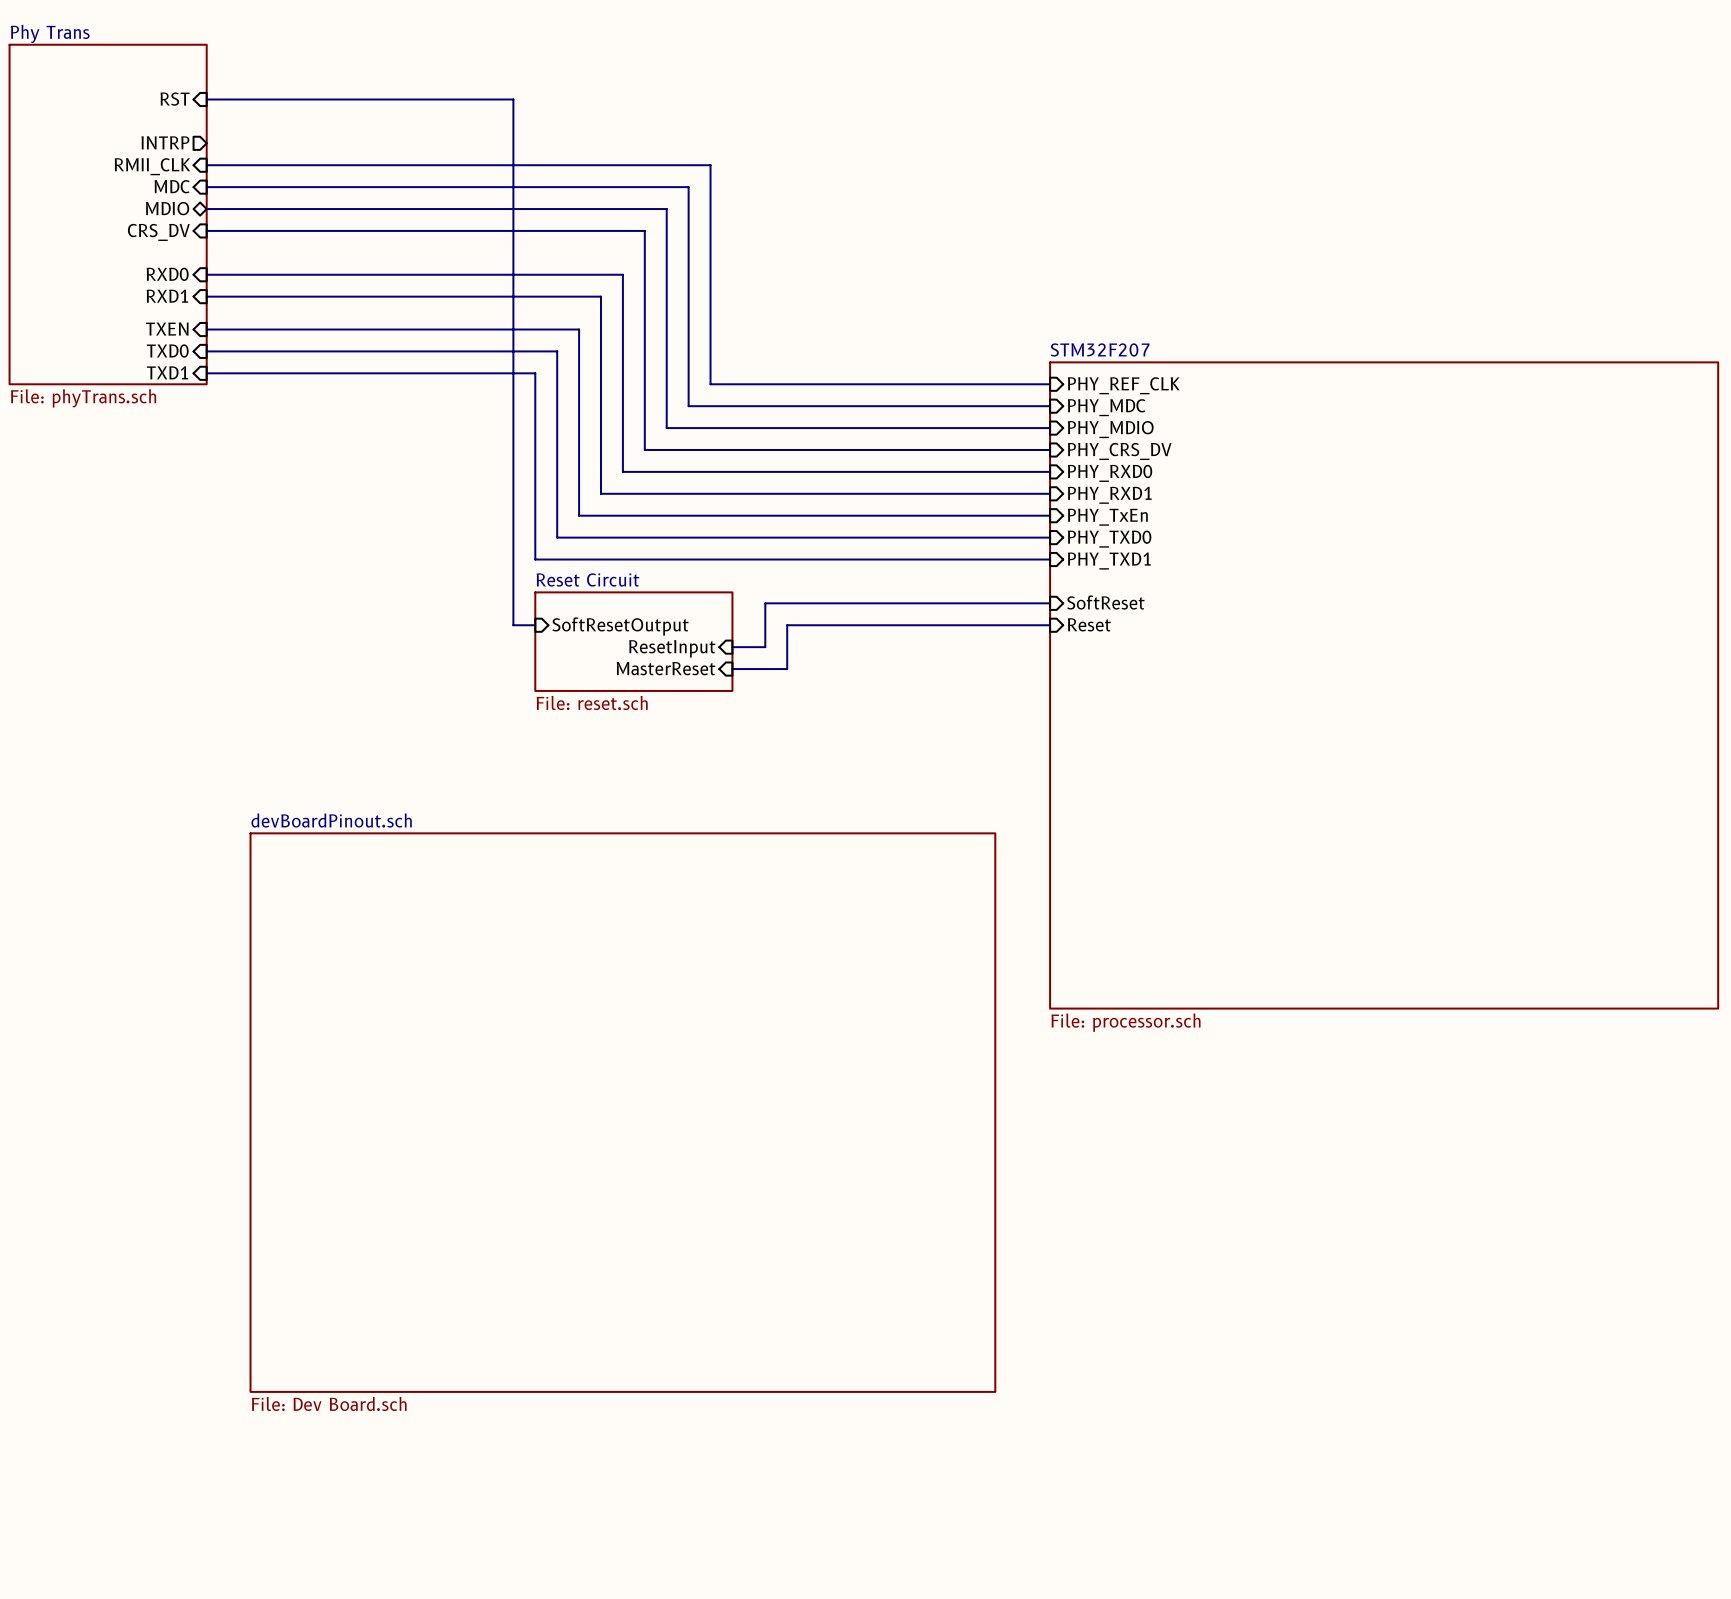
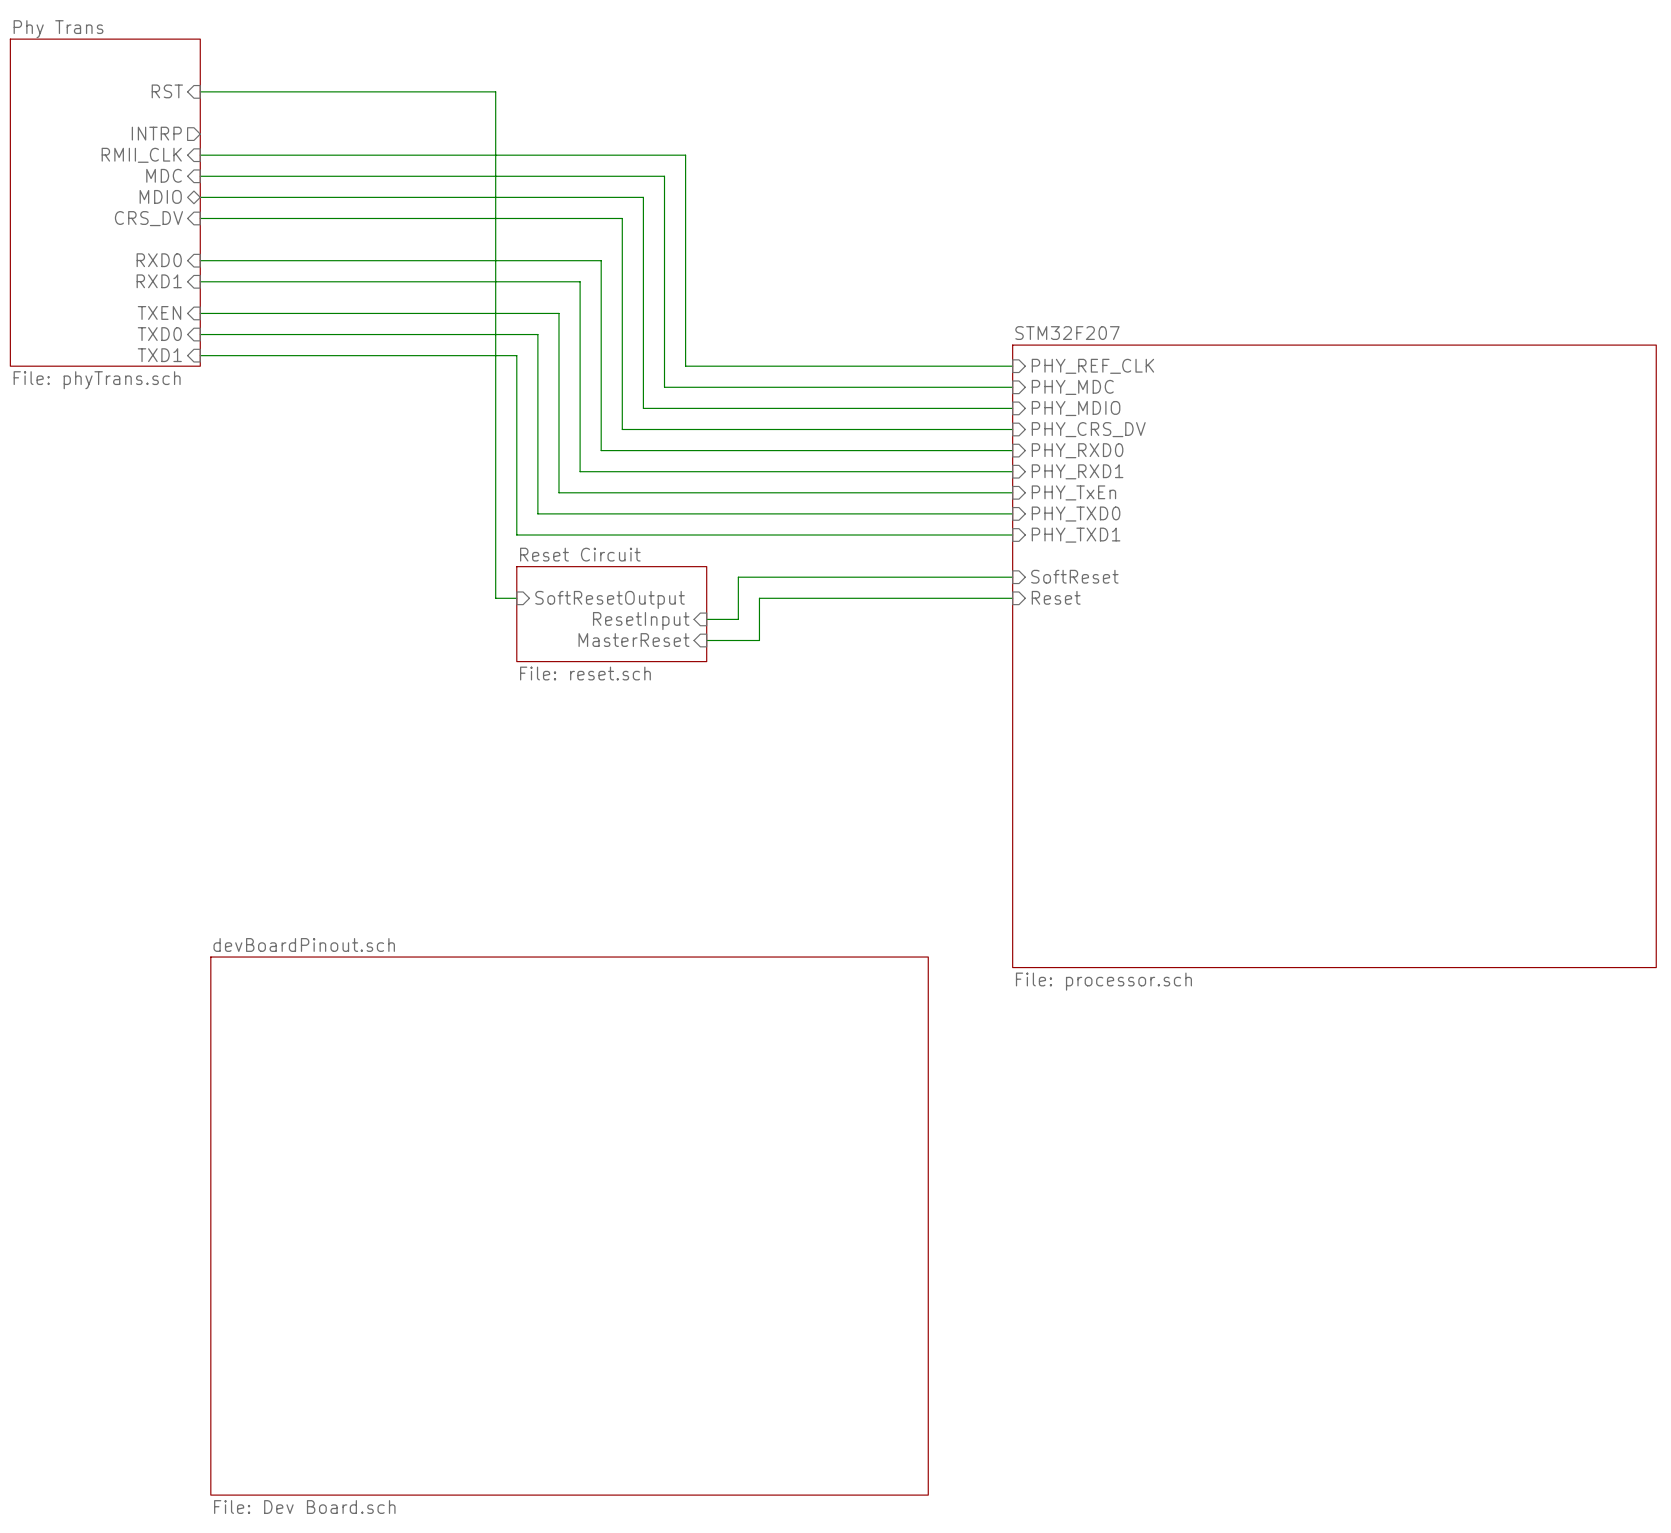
sheet devBoardPinout.sch position: (622, 1112) -> (569, 1226)

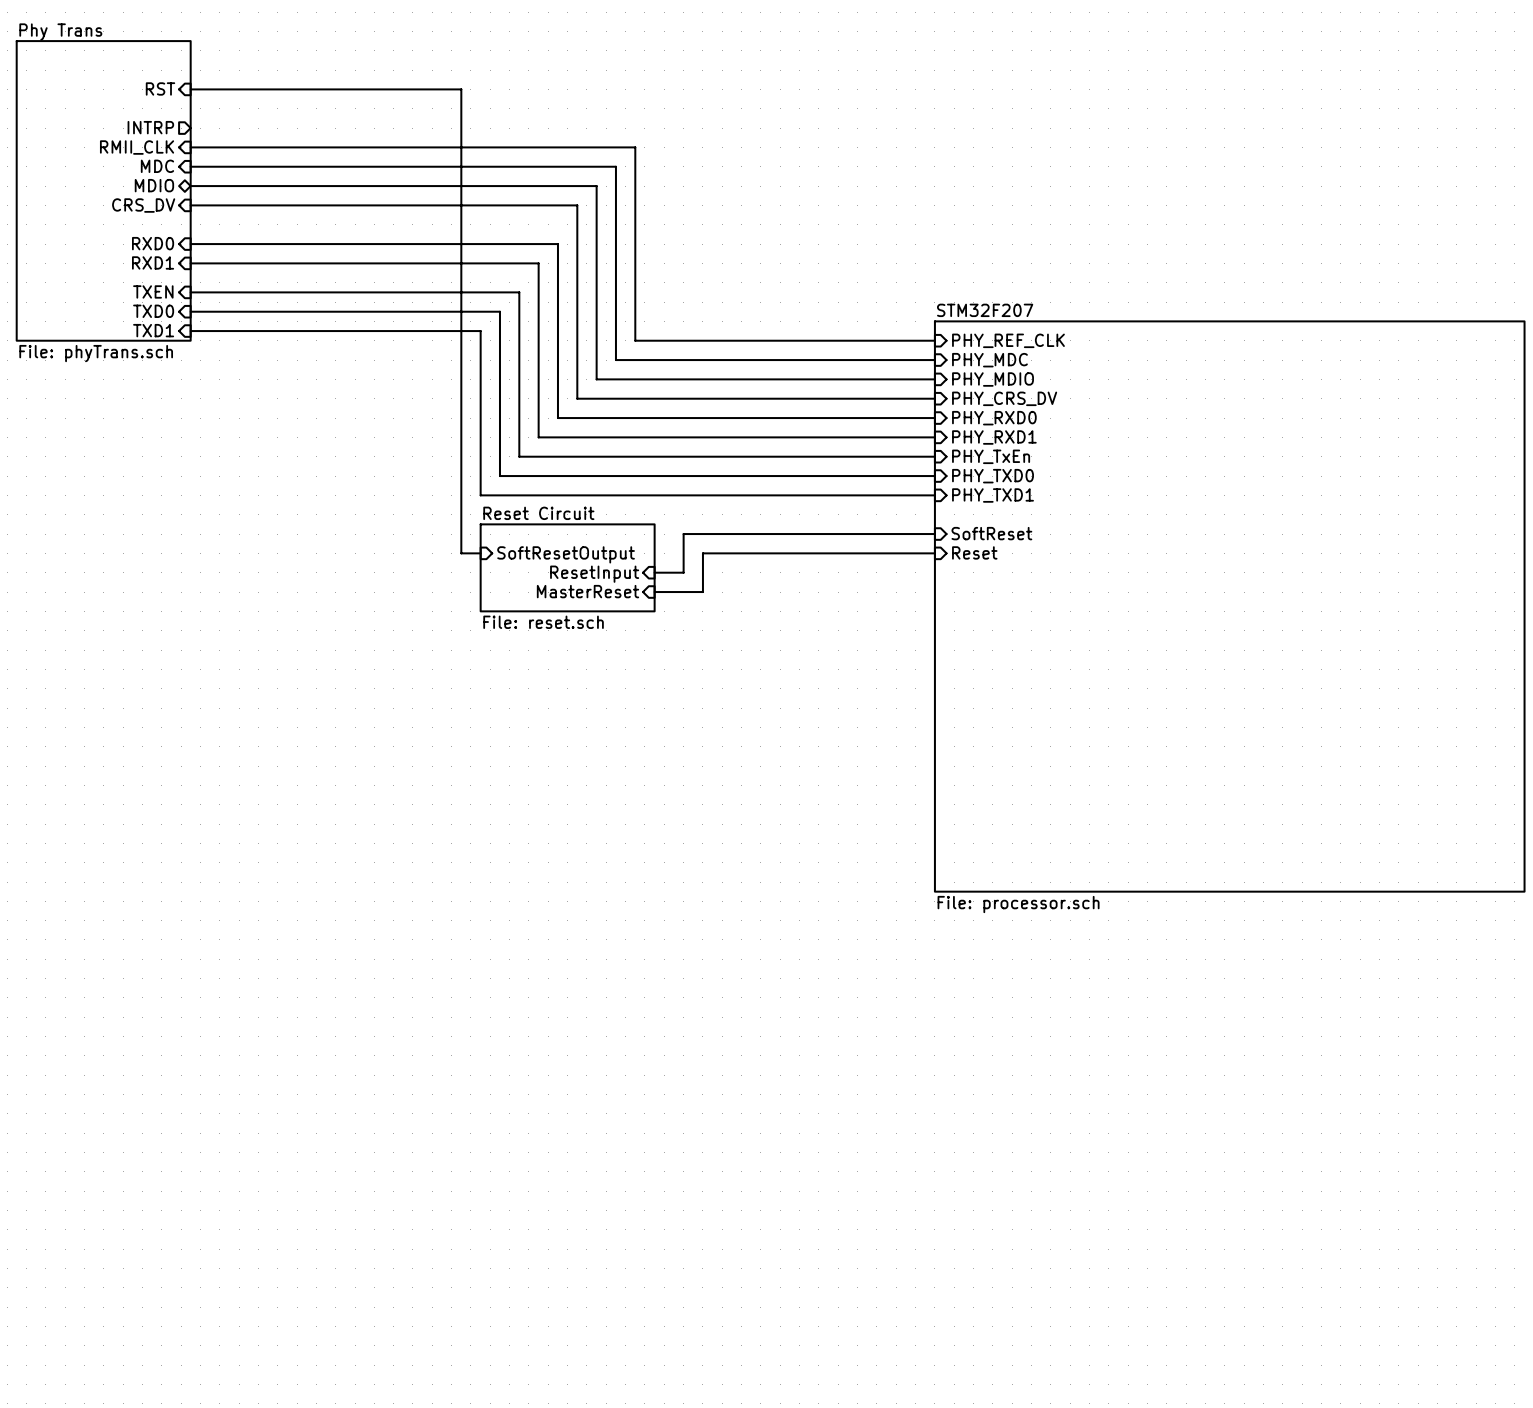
sheet devBoardPinout.sch: File: Dev Board.sch (569, 1226) -> none

